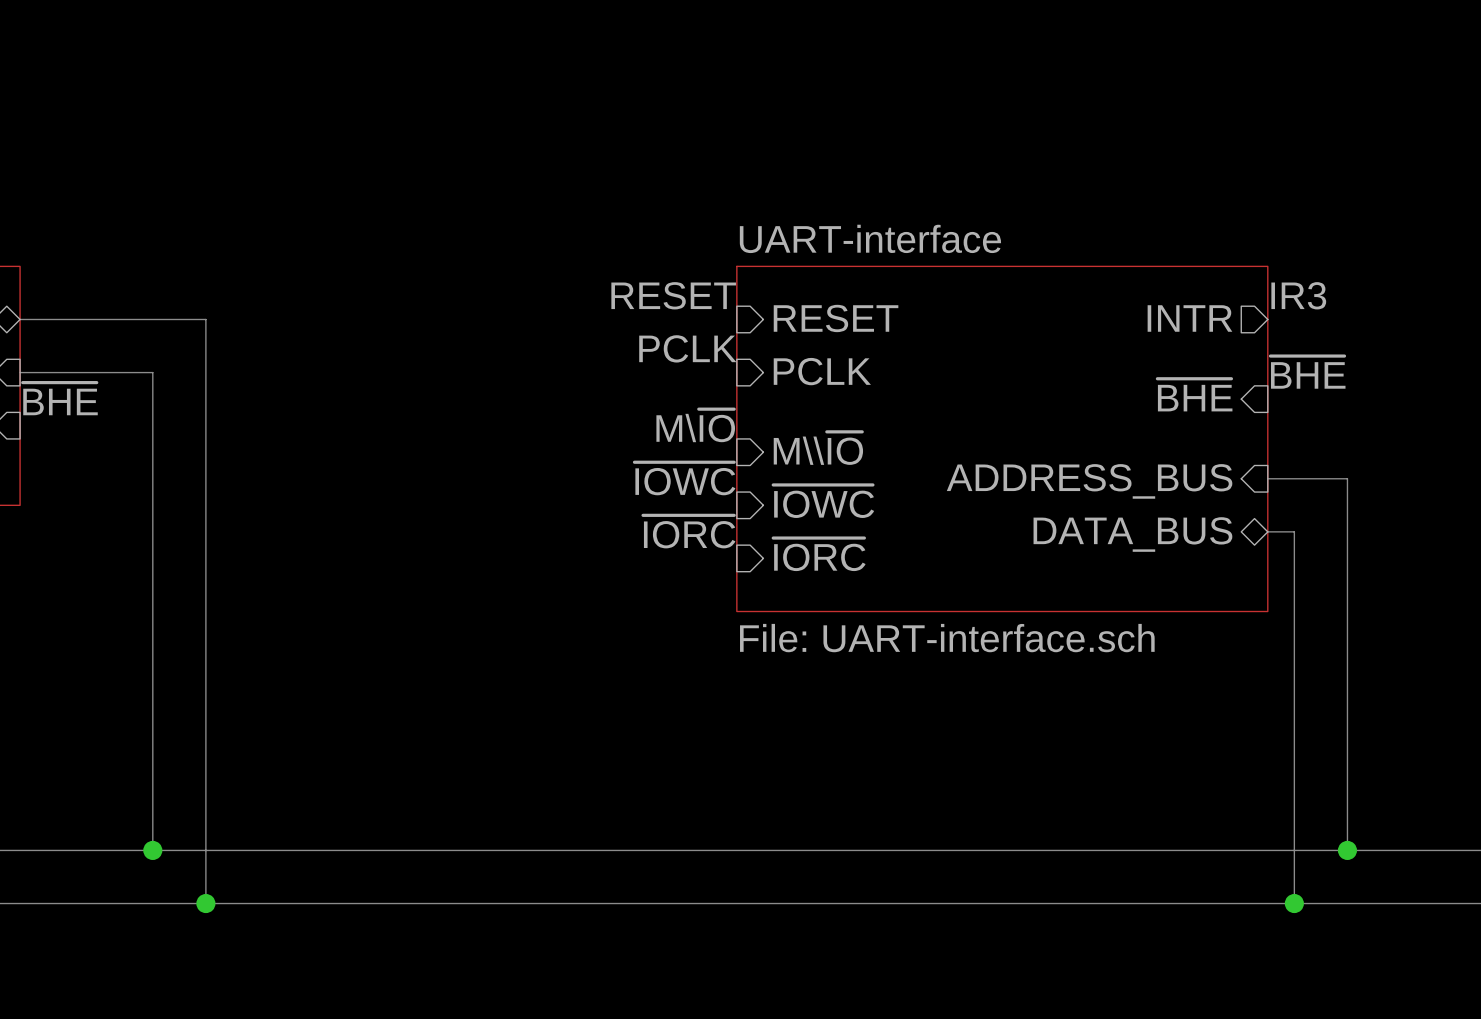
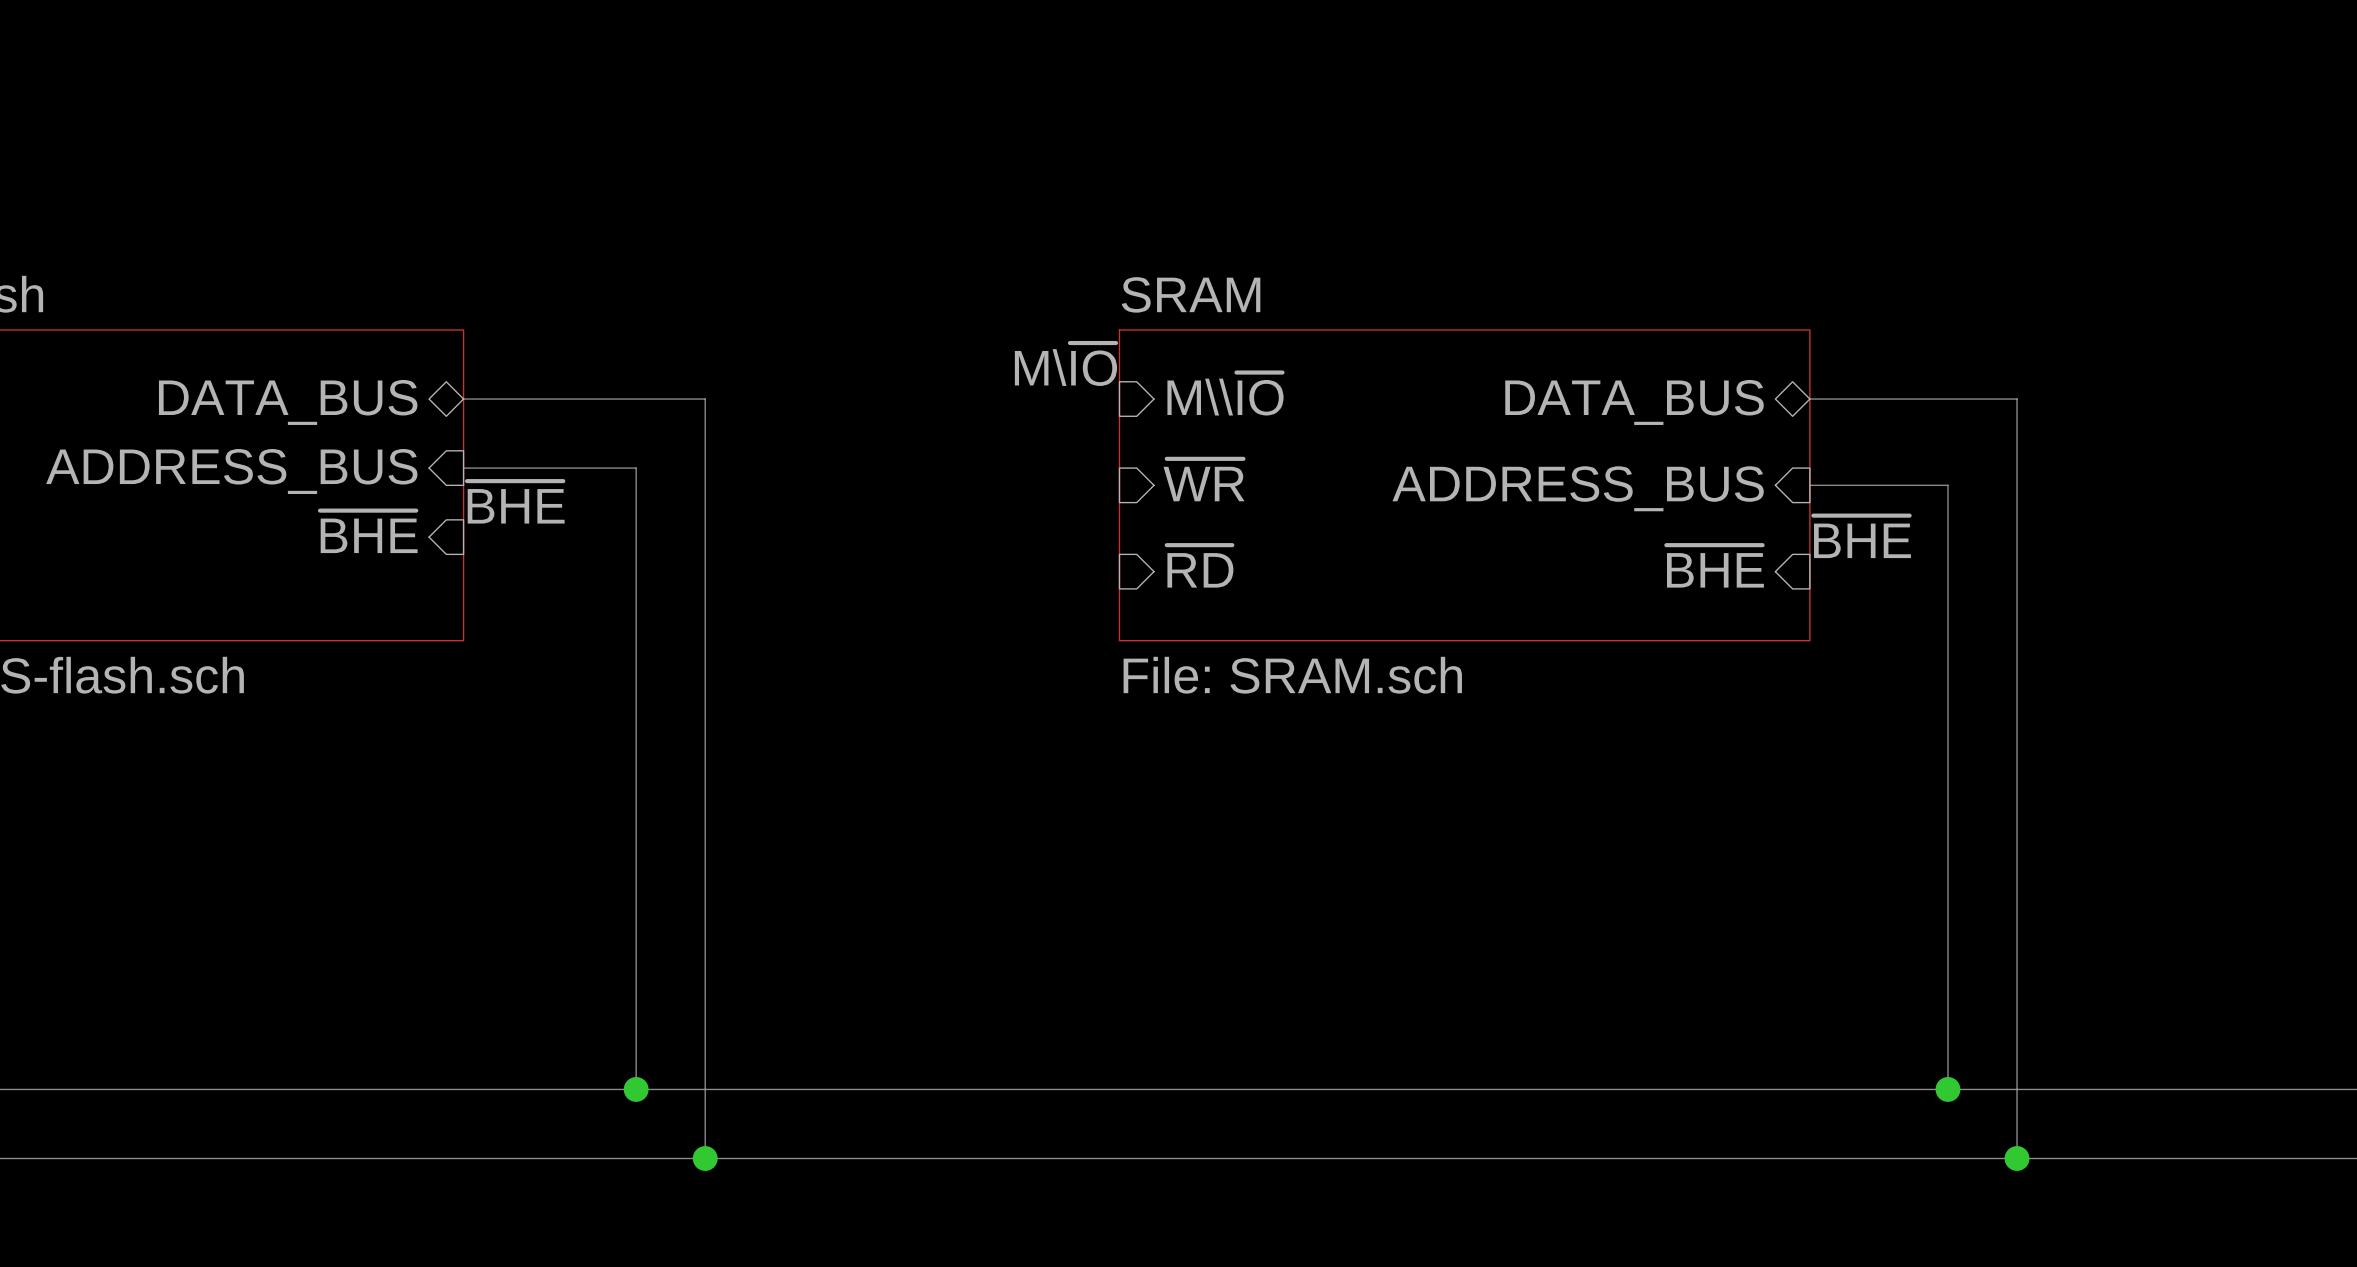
label: RESET (673, 295) -> none
label: IR3 (1298, 295) -> none
sheet pin: RESET (836, 318) -> none
sheet pin: INTR (1189, 318) -> none
bus: none -> (1809, 399) (2017, 399) (2017, 1158)
label: PCLK (687, 348) -> none
sheet pin: PCLK (822, 371) -> none
label position: ~{BHE} (1307, 372) -> ~{BHE} (1862, 536)
sheet pin: none -> ~{WR} (1204, 480)
sheet SRAM: none -> File: SRAM.sch (1464, 485)
bus: none -> (1809, 485) (1947, 485) (1947, 1089)
sheet pin position: ~{BHE} (1194, 395) -> ~{BHE} (1715, 566)
label position: M\~{IO} (695, 425) -> M\~{IO} (1065, 364)
sheet UART-interface: File: UART-interface.sch (1002, 438) -> none
sheet pin: none -> ~{RD} (1200, 566)
sheet pin position: M\\~{IO} (818, 448) -> M\\~{IO} (1225, 394)
label: ~{IOWC} (684, 478) -> none
bus: (1267, 478) (1347, 478) (1347, 850) -> none
sheet pin position: ADDRESS_BUS (1089, 481) -> ADDRESS_BUS (1578, 488)
sheet pin: ~{IOWC} (823, 501) -> none
label: ~{IORC} (689, 531) -> none
bus: (1267, 531) (1294, 531) (1294, 903) -> none
sheet pin position: DATA_BUS (1132, 534) -> DATA_BUS (1634, 402)
sheet pin: ~{IORC} (819, 554) -> none
junction: none -> (1947, 1089)
junction: (1347, 850) -> none
junction: none -> (2017, 1158)
junction: (1294, 903) -> none

